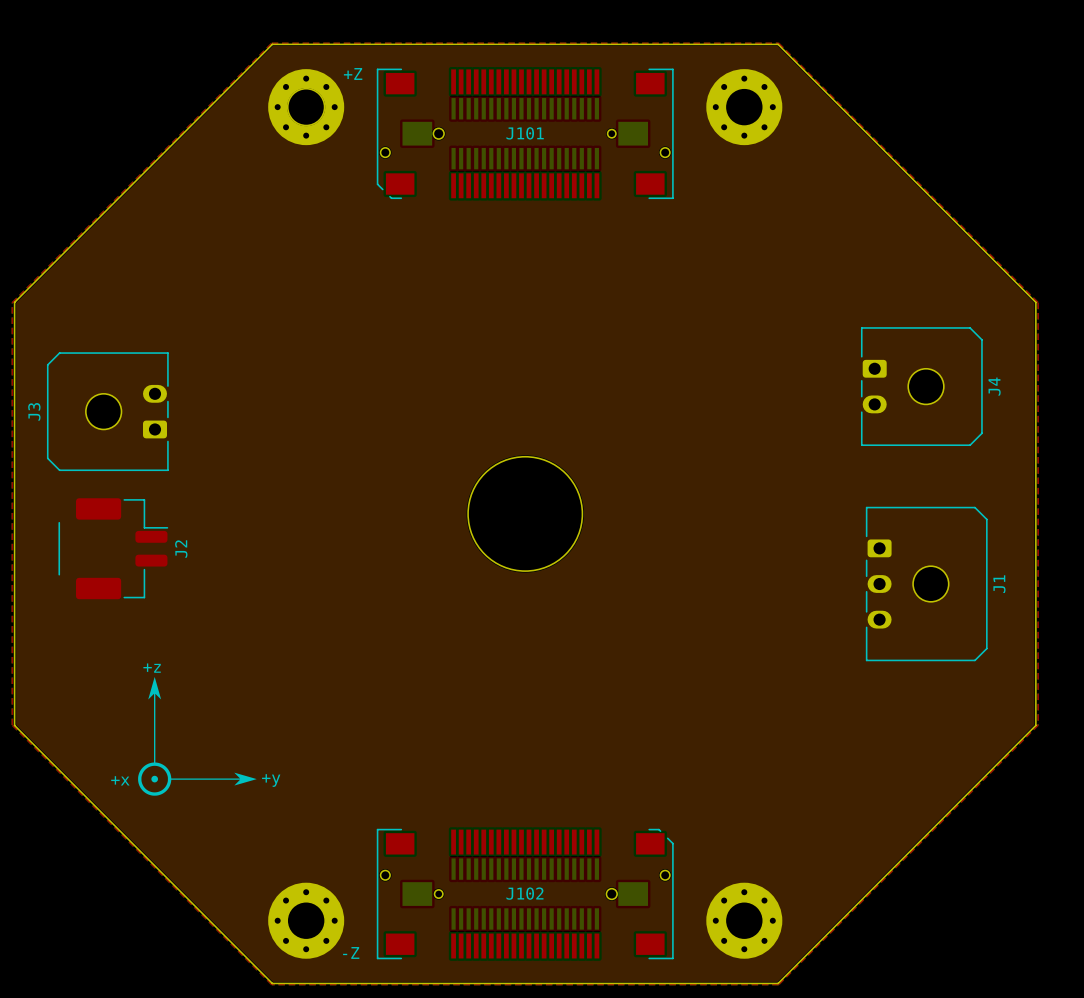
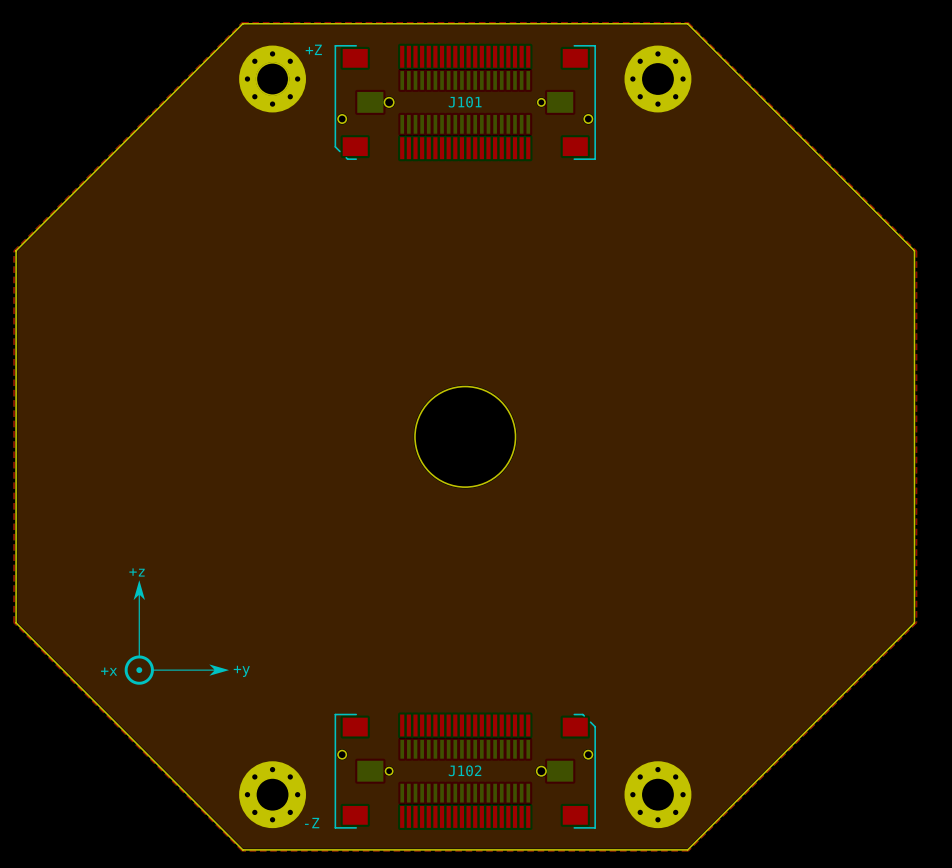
J4: (921, 386) -> none
J3: (107, 411) -> none
J2: (113, 548) -> none
J1: (926, 584) -> none

